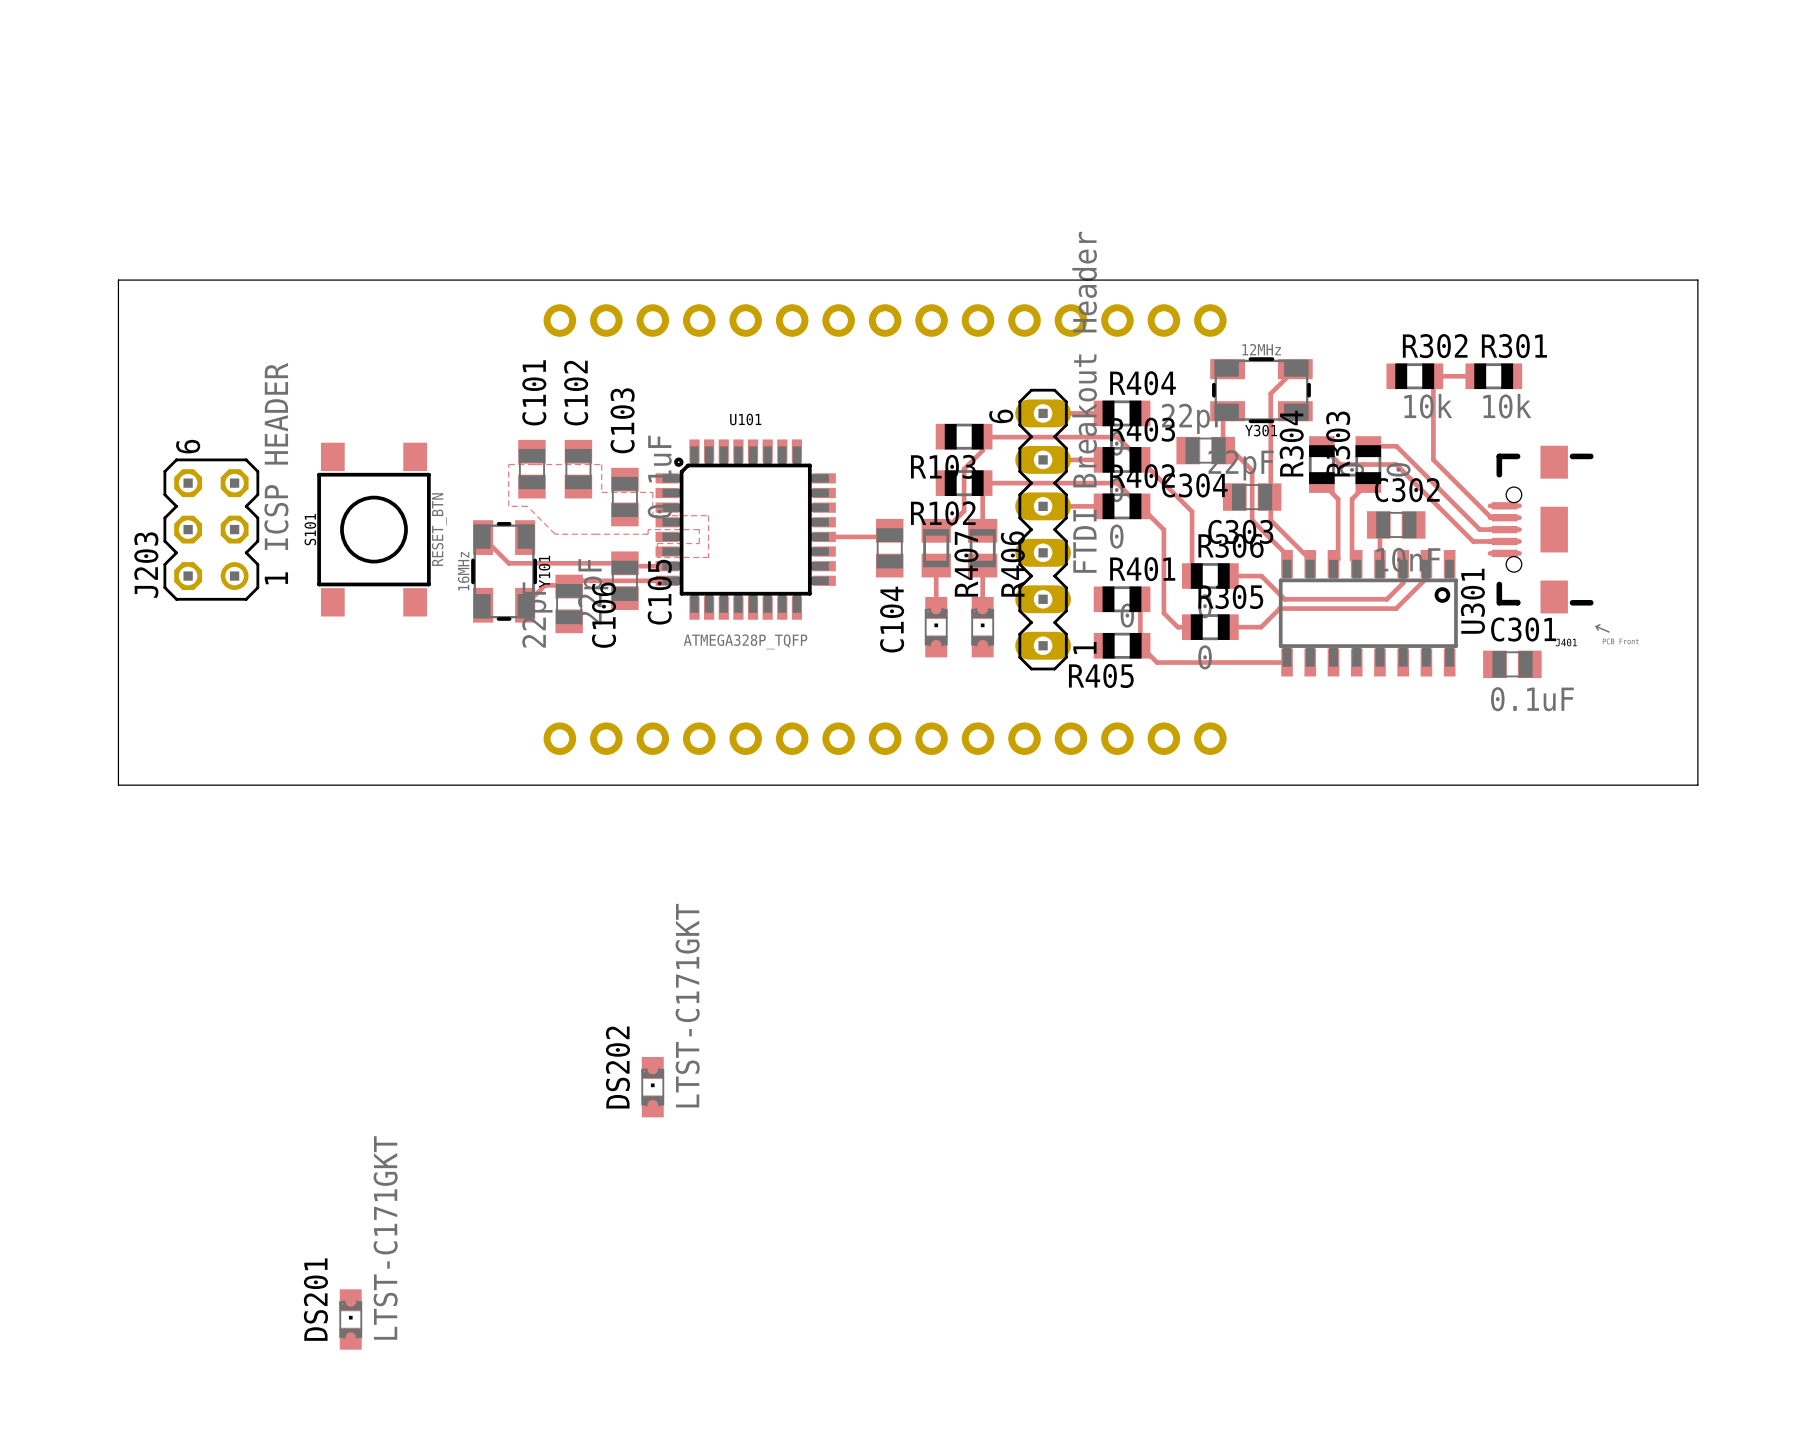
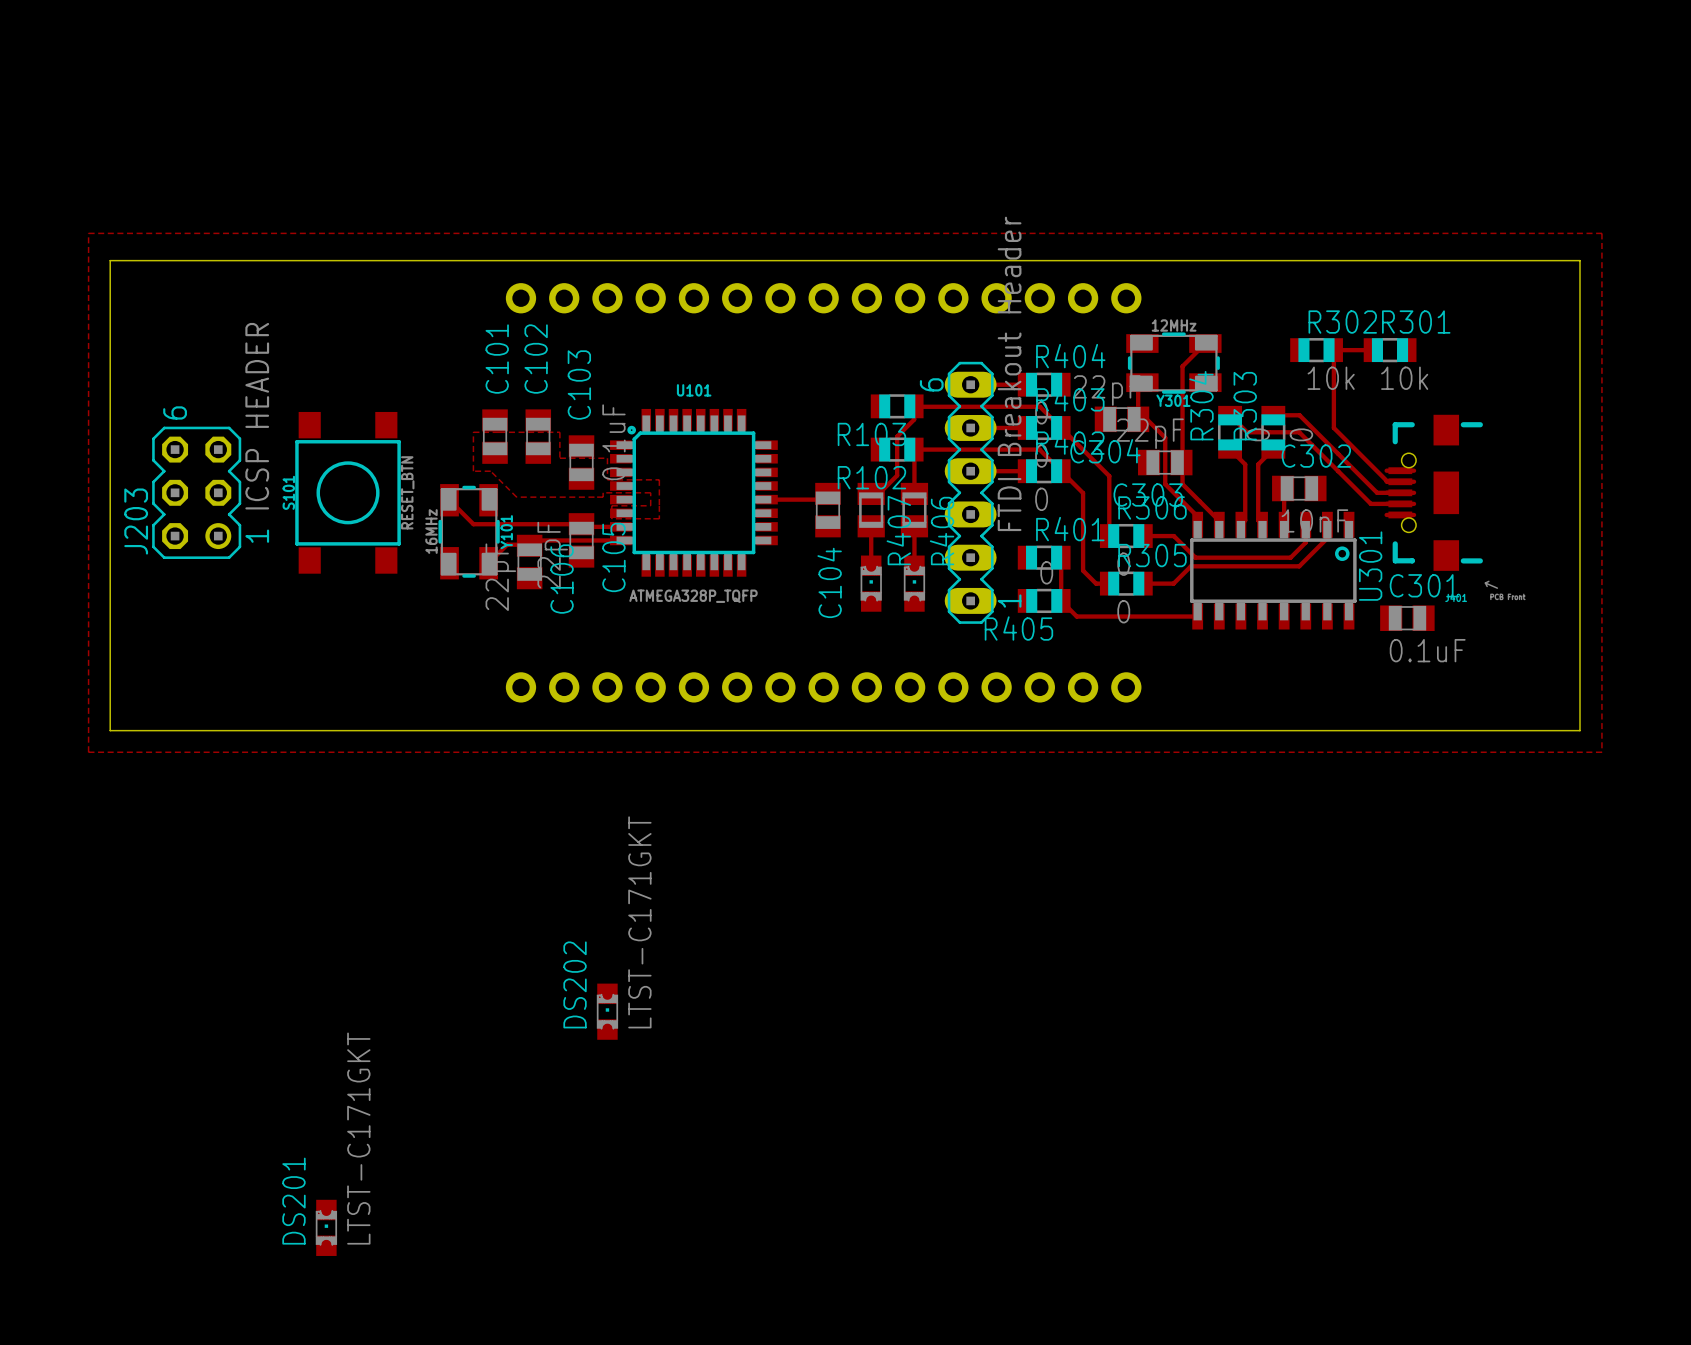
top zone outline: none -> (88, 233) (1601, 233) (1601, 752) (88, 752) (88, 233)

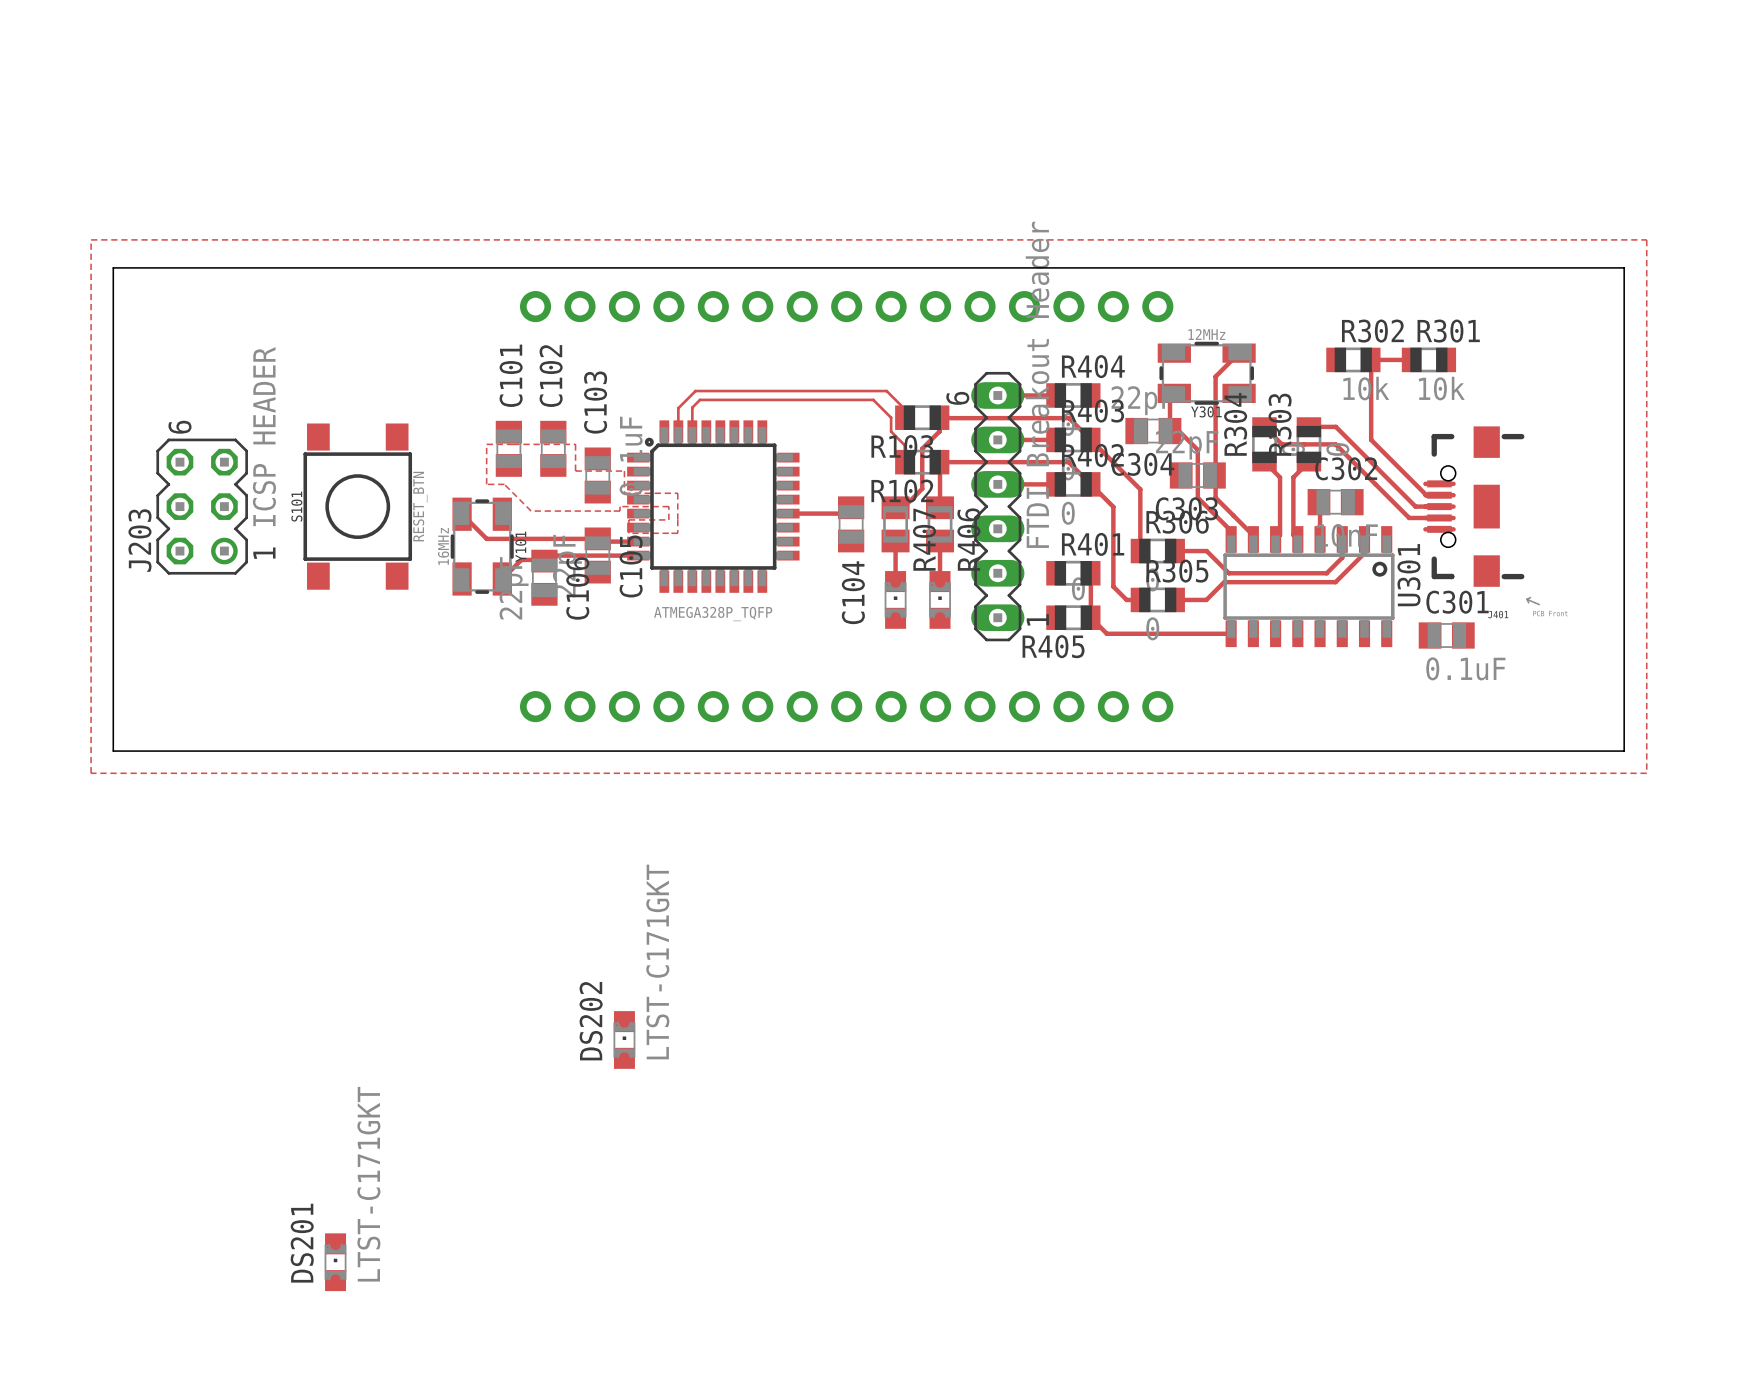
U101 name: U101 (694, 390) -> none
top track: none -> (904, 417) (904, 409) (886, 391) (695, 391) (678, 408) (678, 431)
top track: none -> (692, 431) (692, 407) (700, 399) (873, 399) (891, 417) (891, 431) (904, 445) (904, 462)

